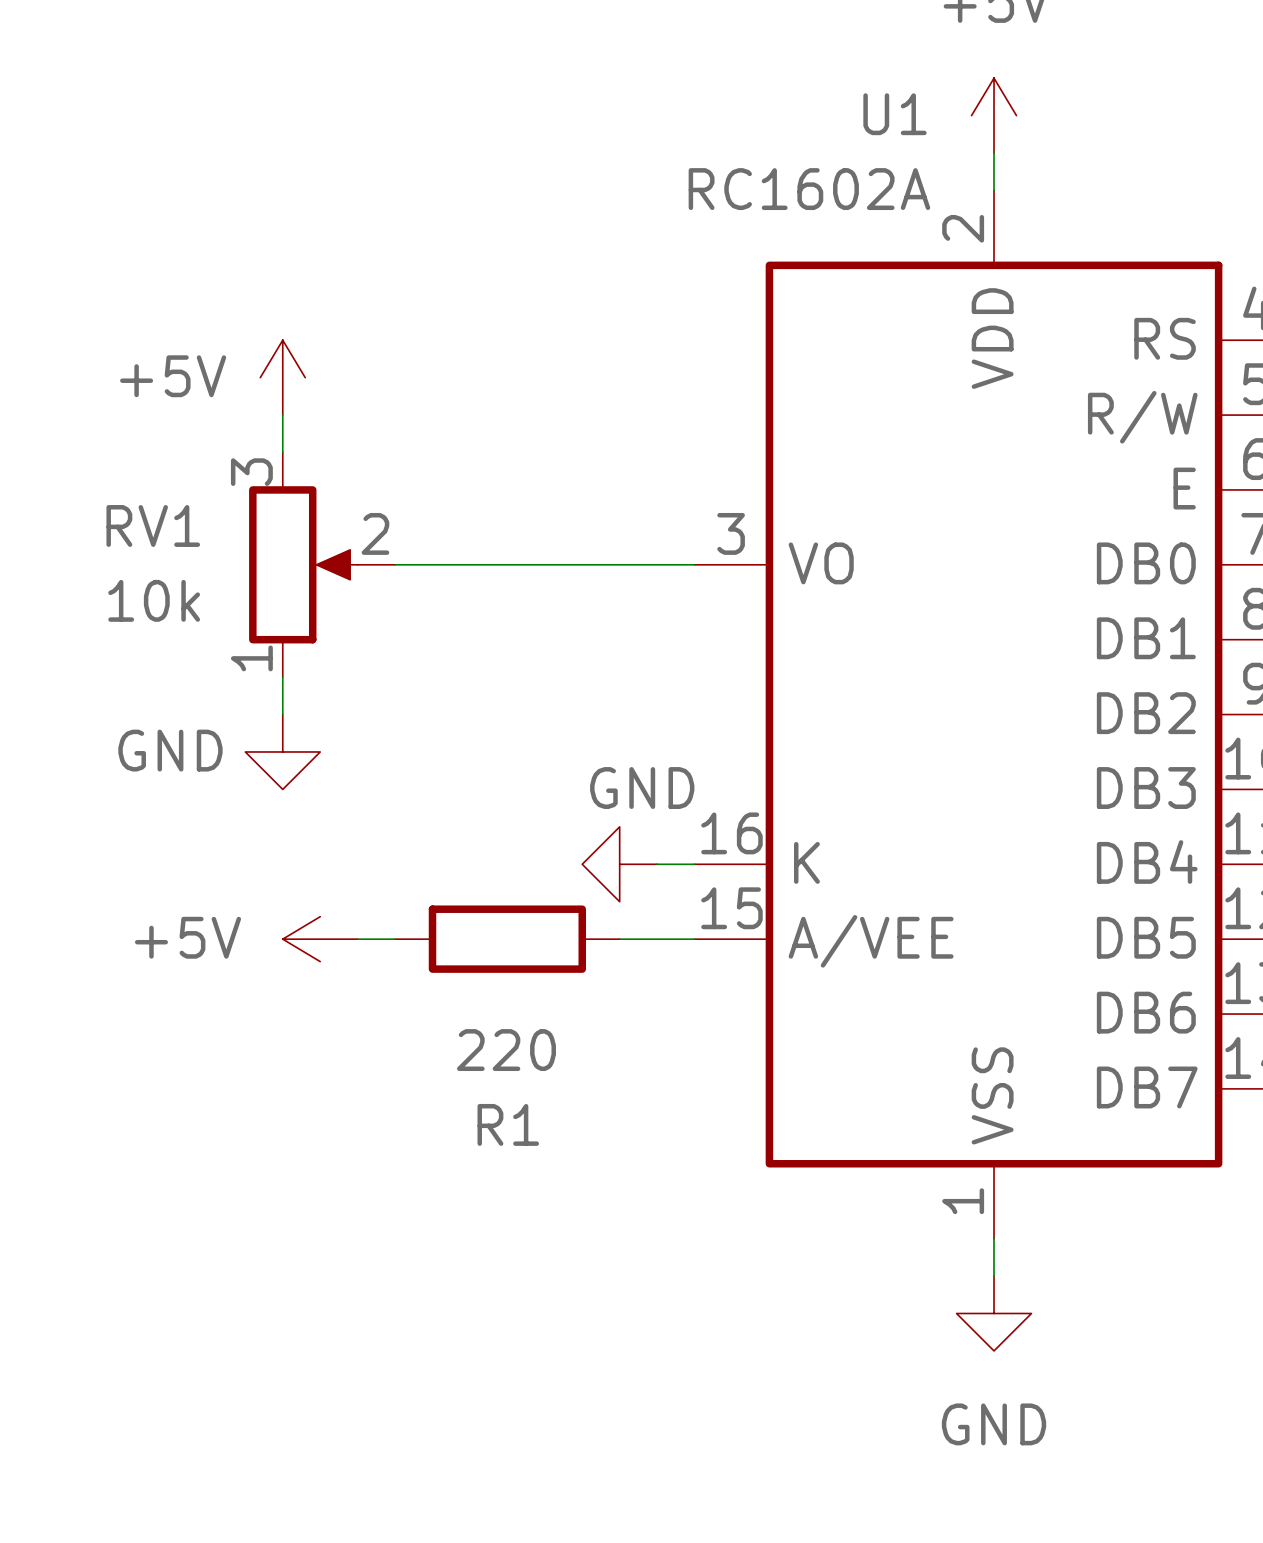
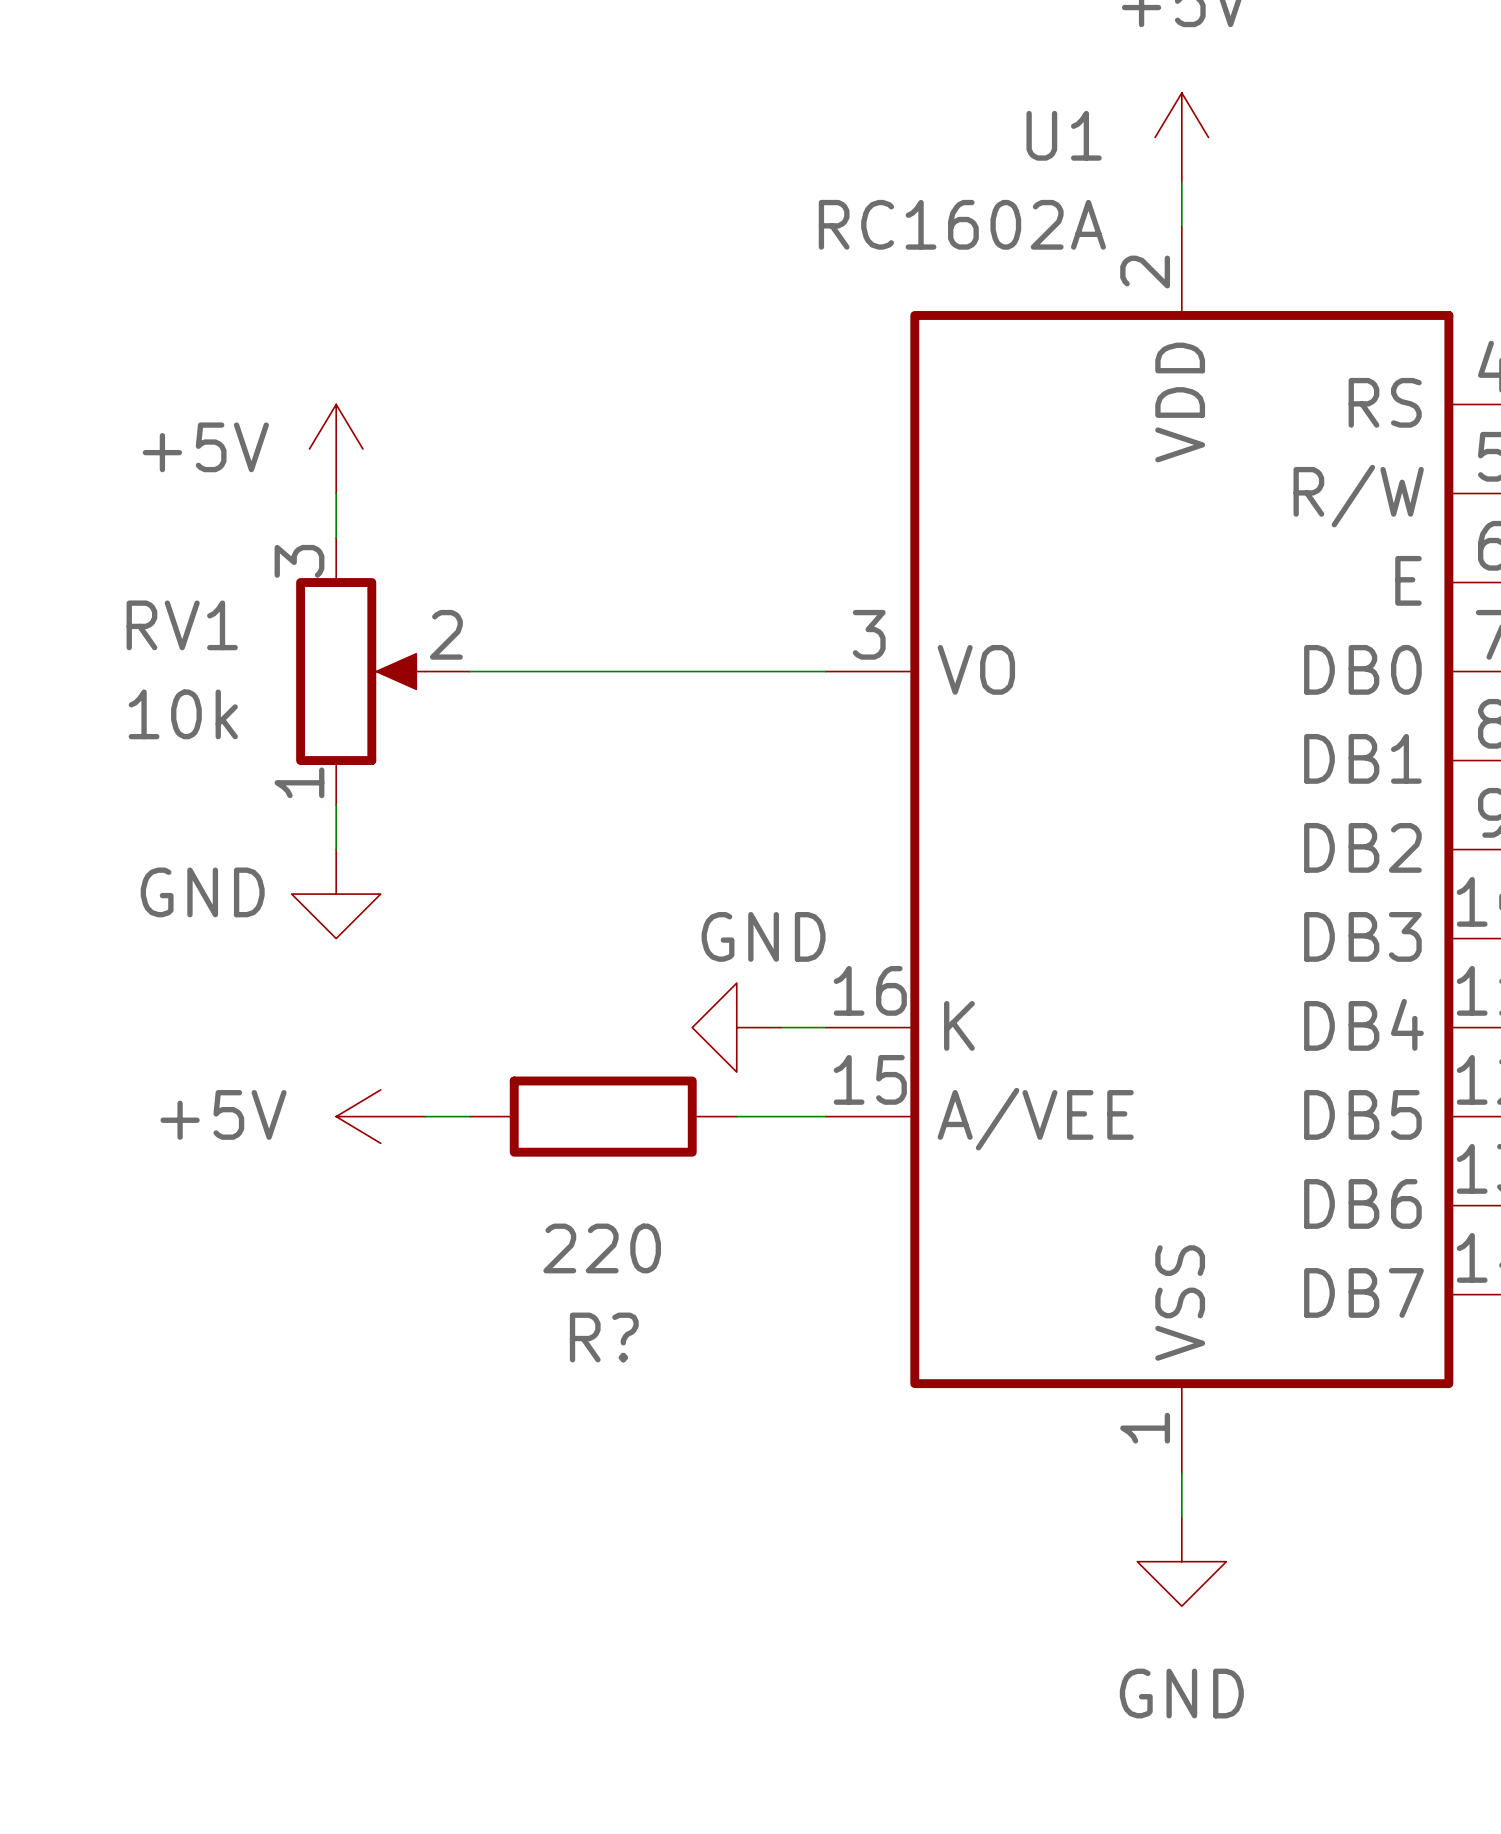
R1 name: R1 (508, 1124) -> R? (604, 1337)

